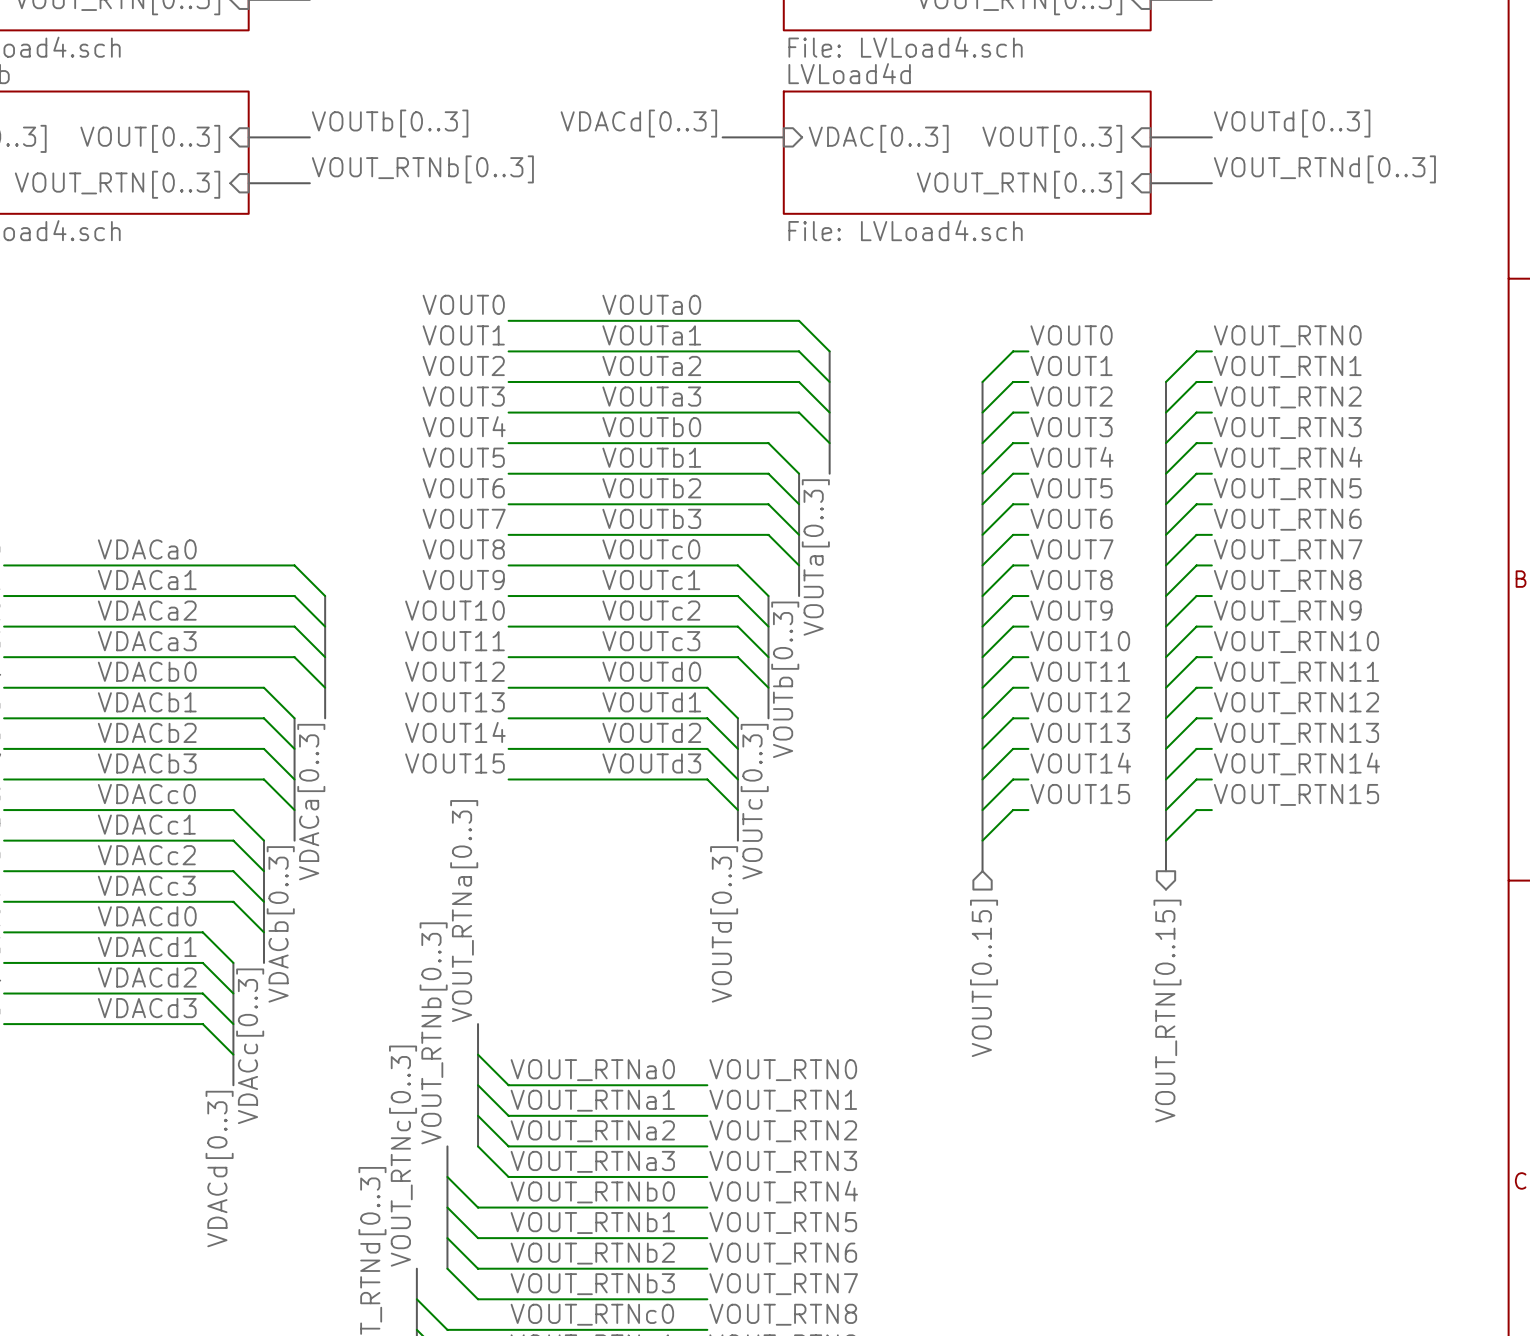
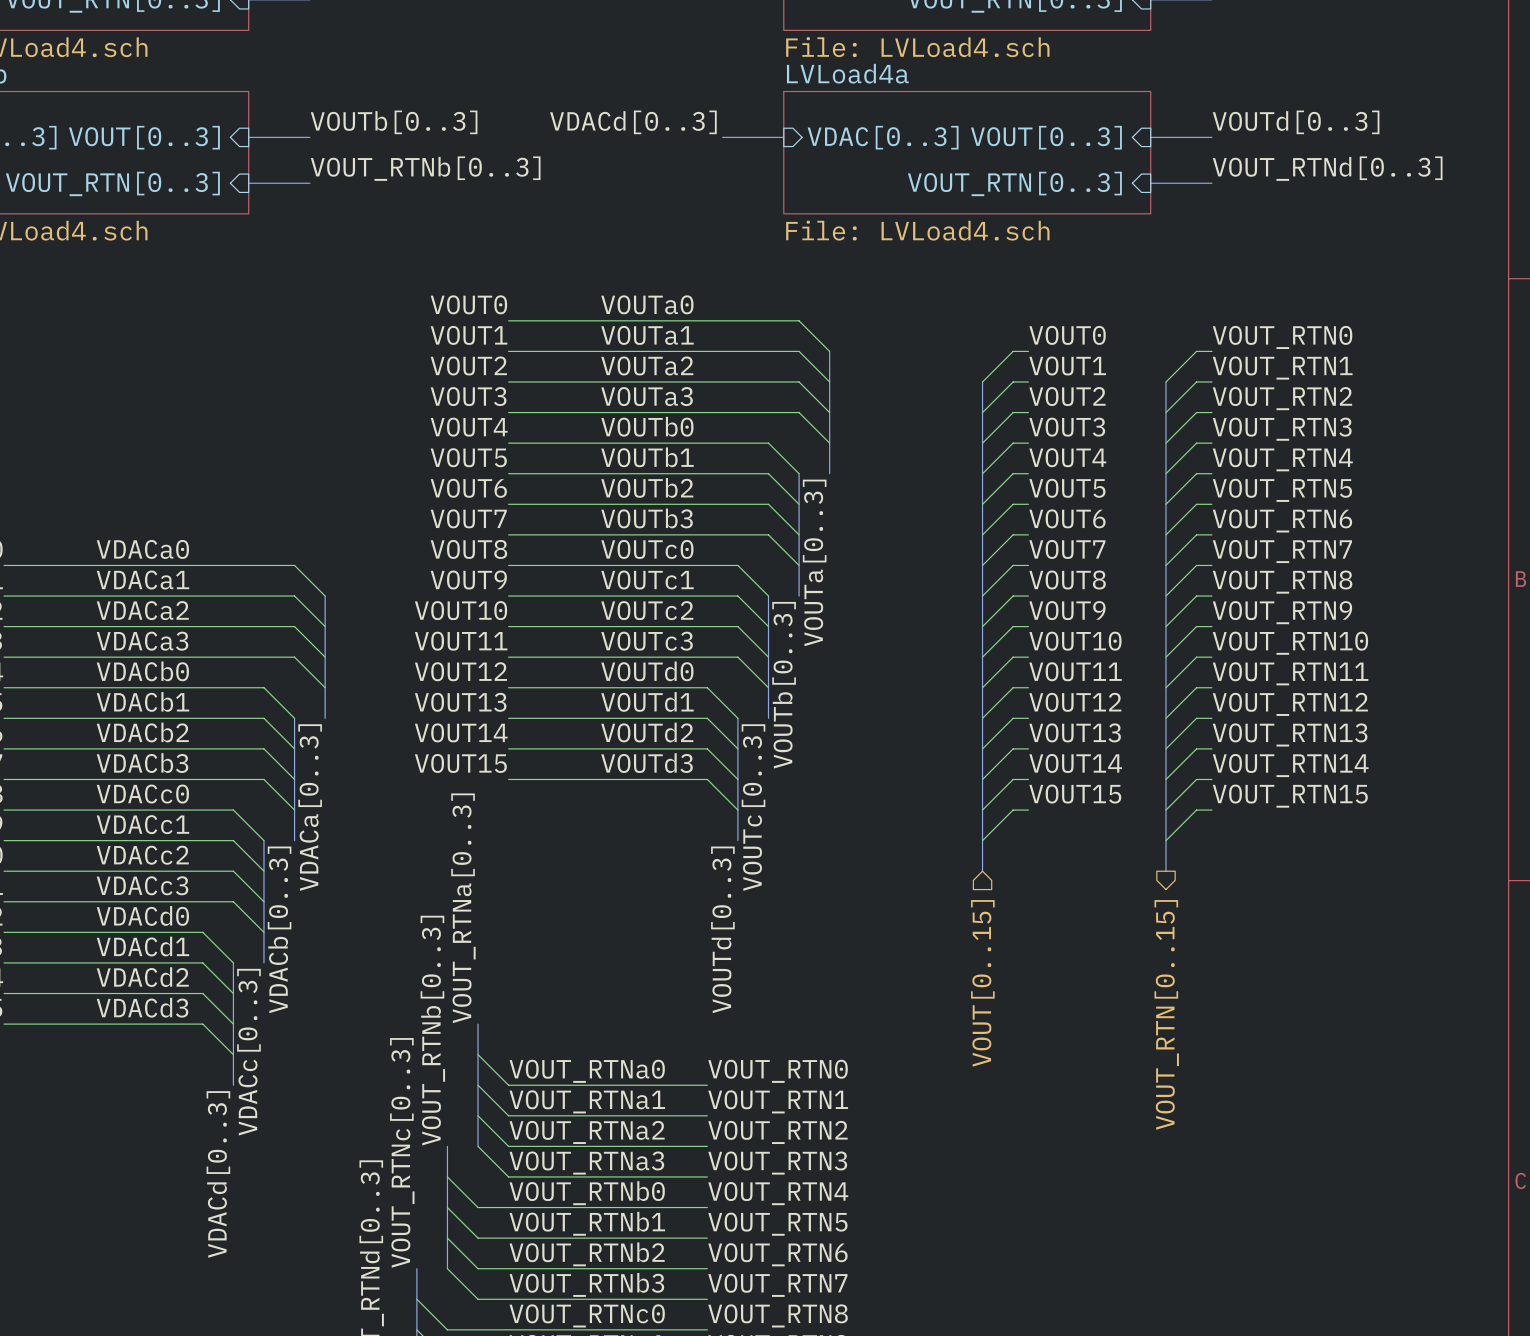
sheet LVLoad4d name: LVLoad4d (849, 73) -> LVLoad4a (847, 73)

